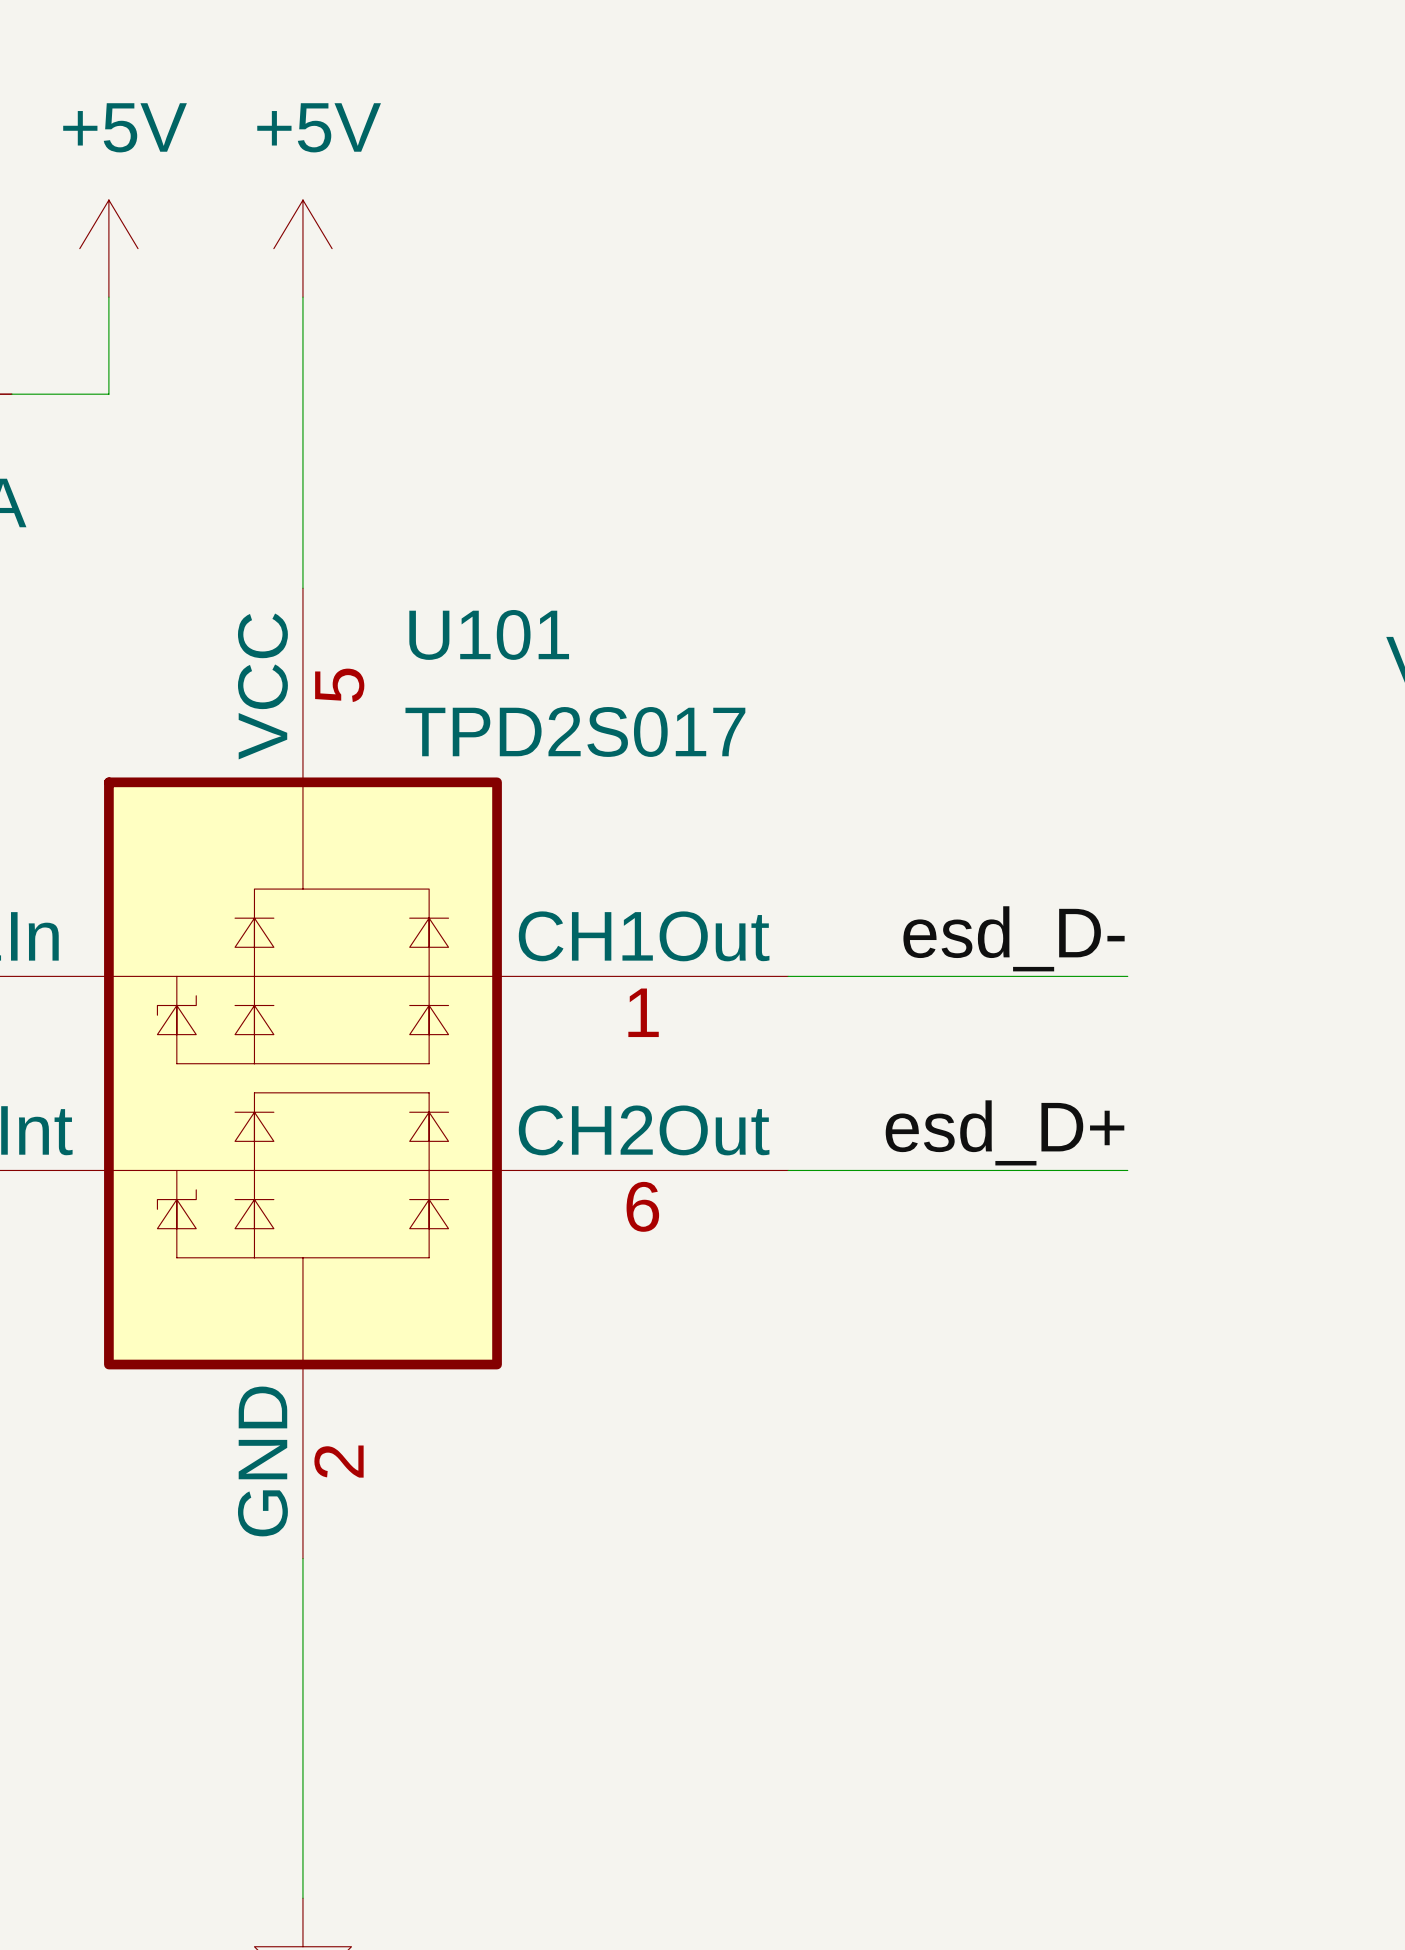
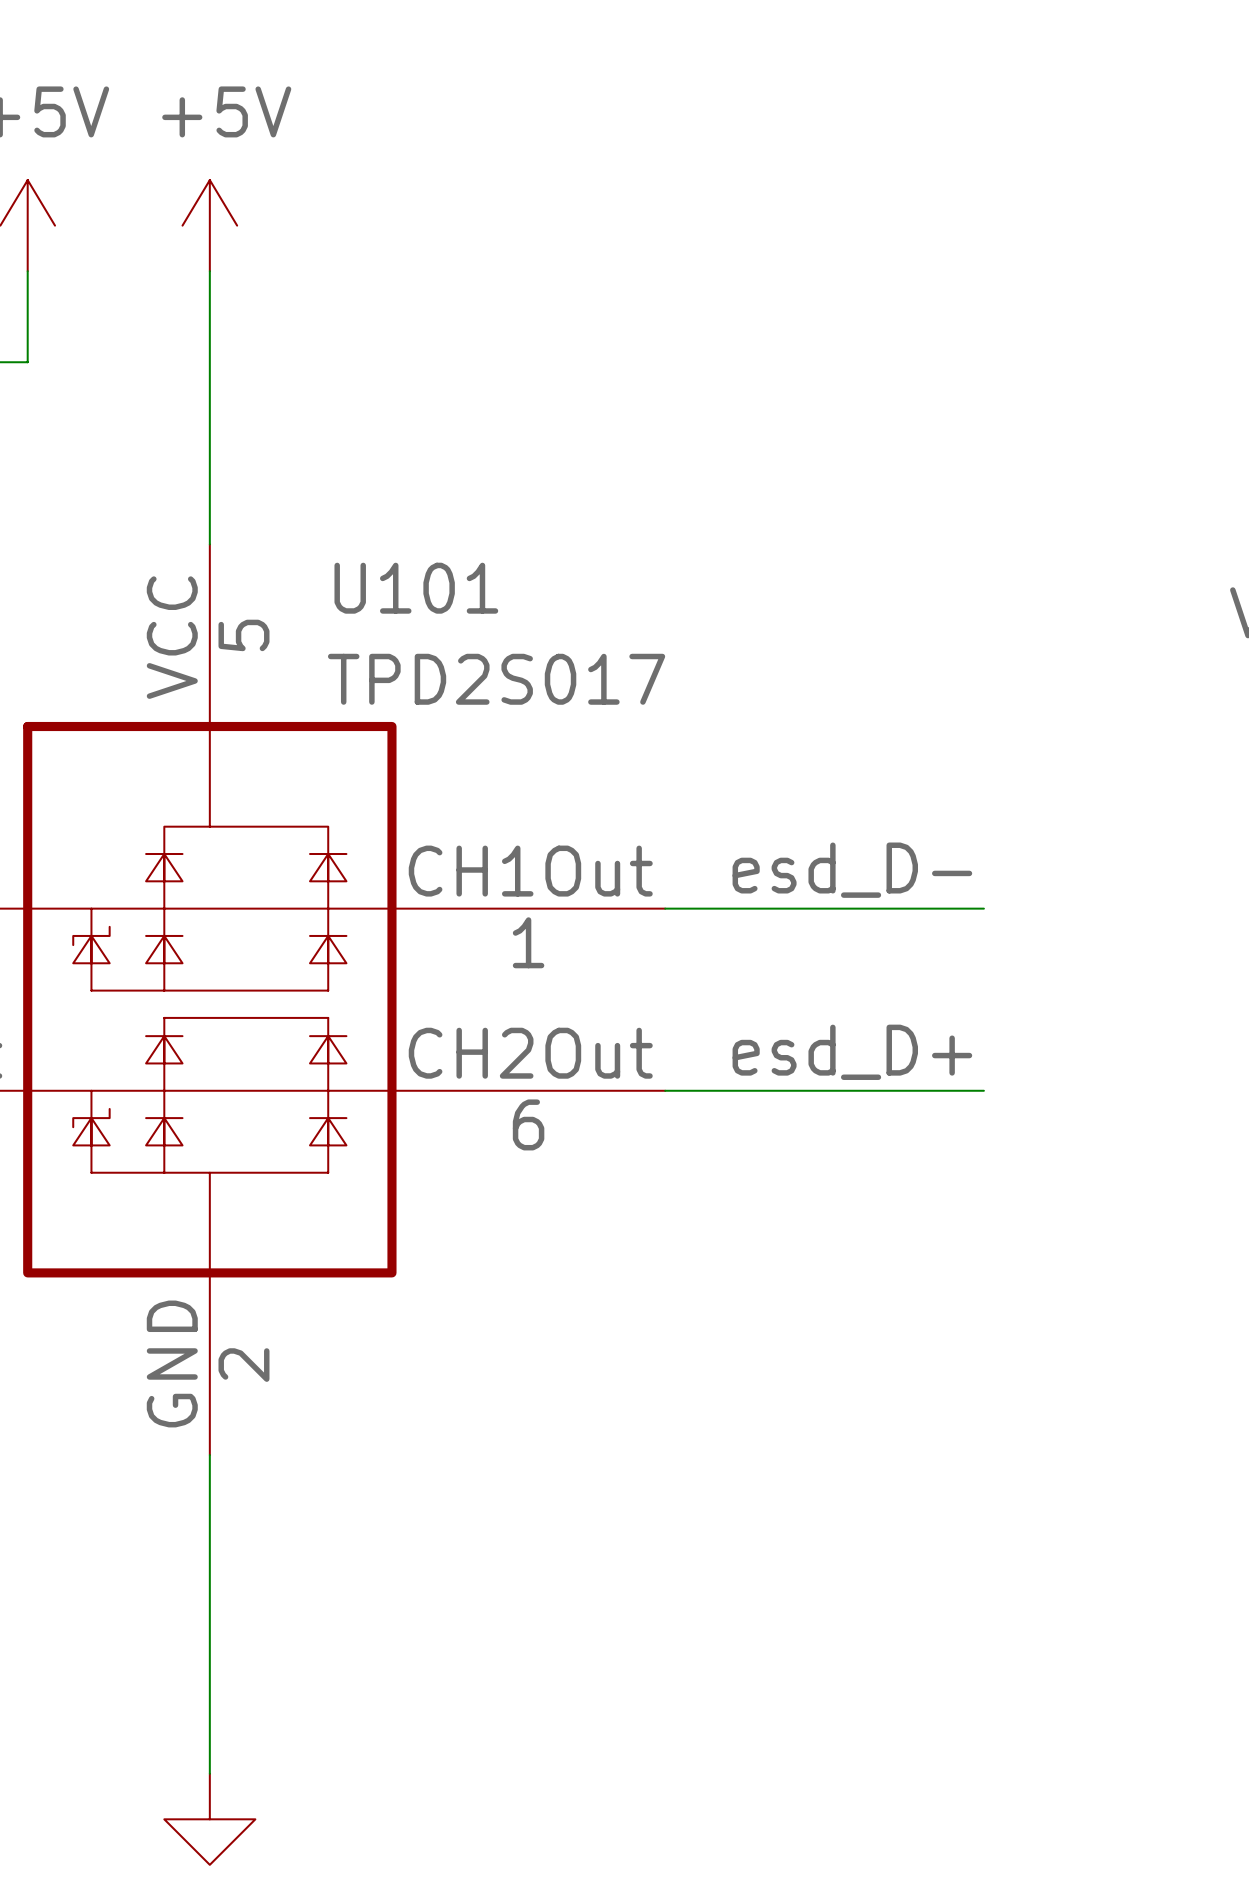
U101 name position: U101 (489, 634) -> U101 (416, 588)
U101 value position: TPD2S017 (575, 731) -> TPD2S017 (496, 679)

